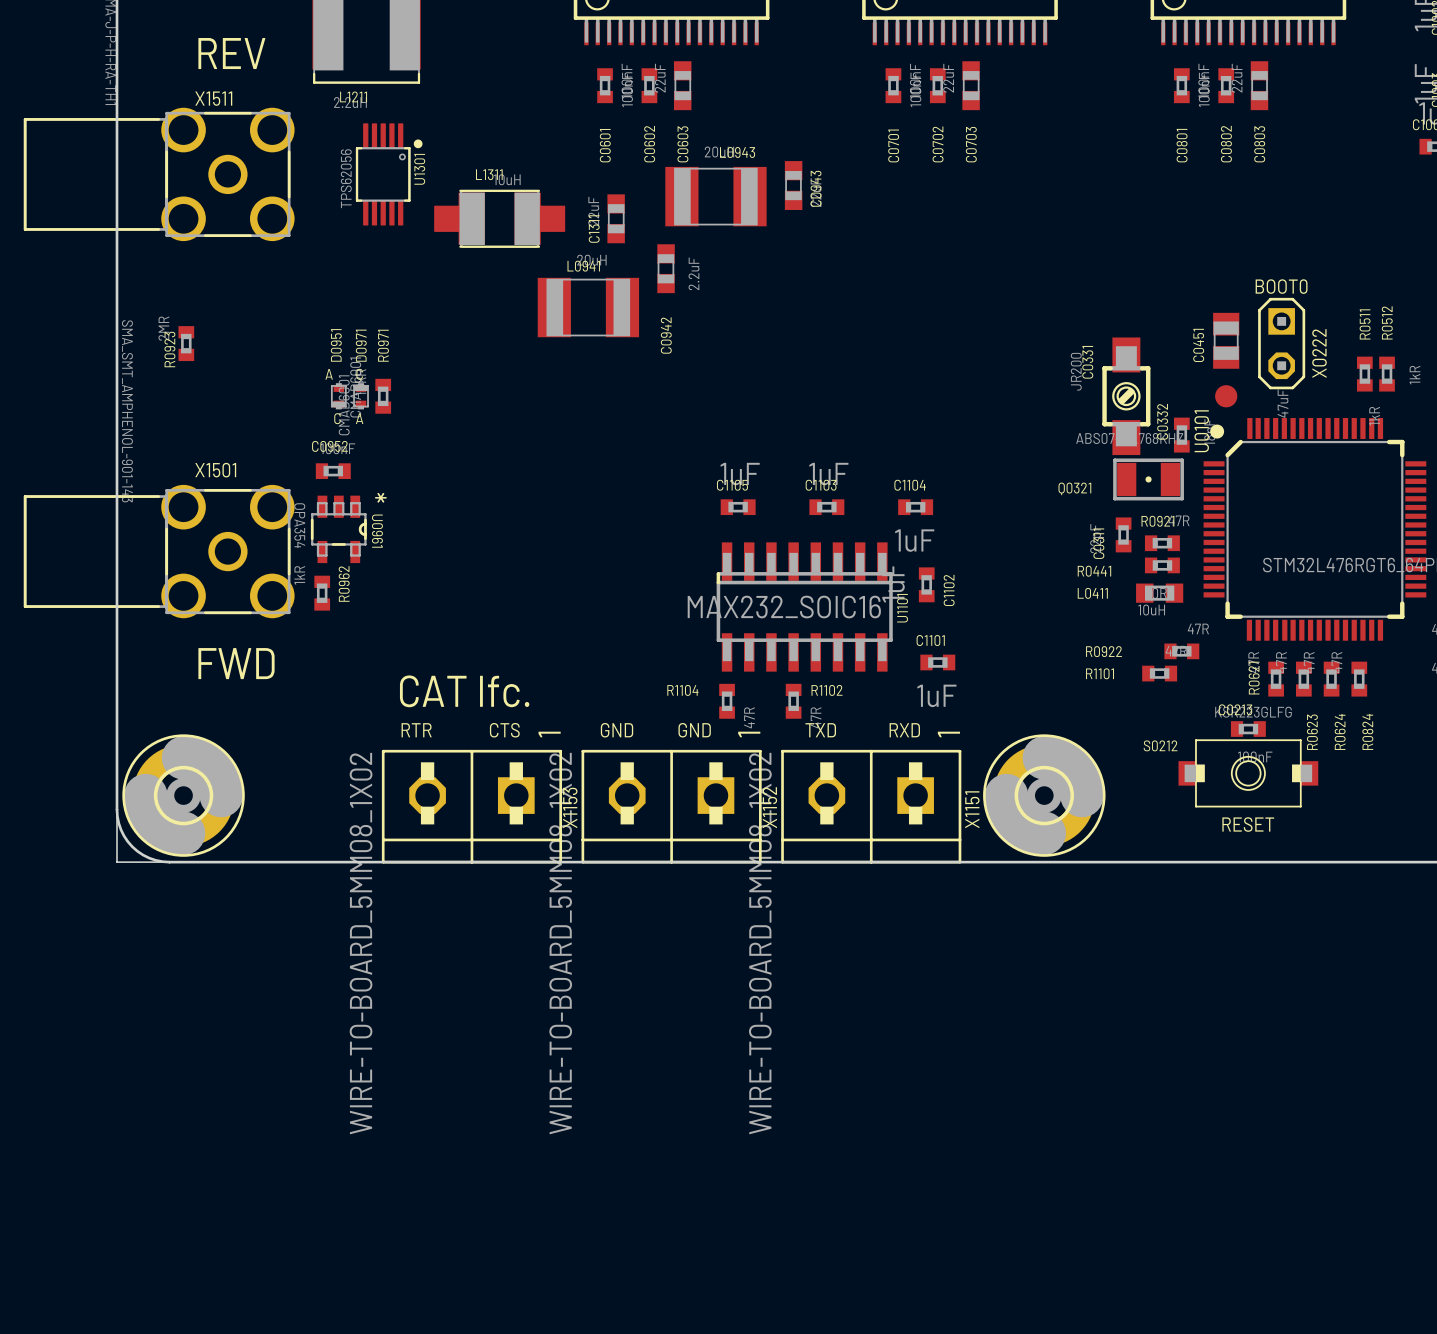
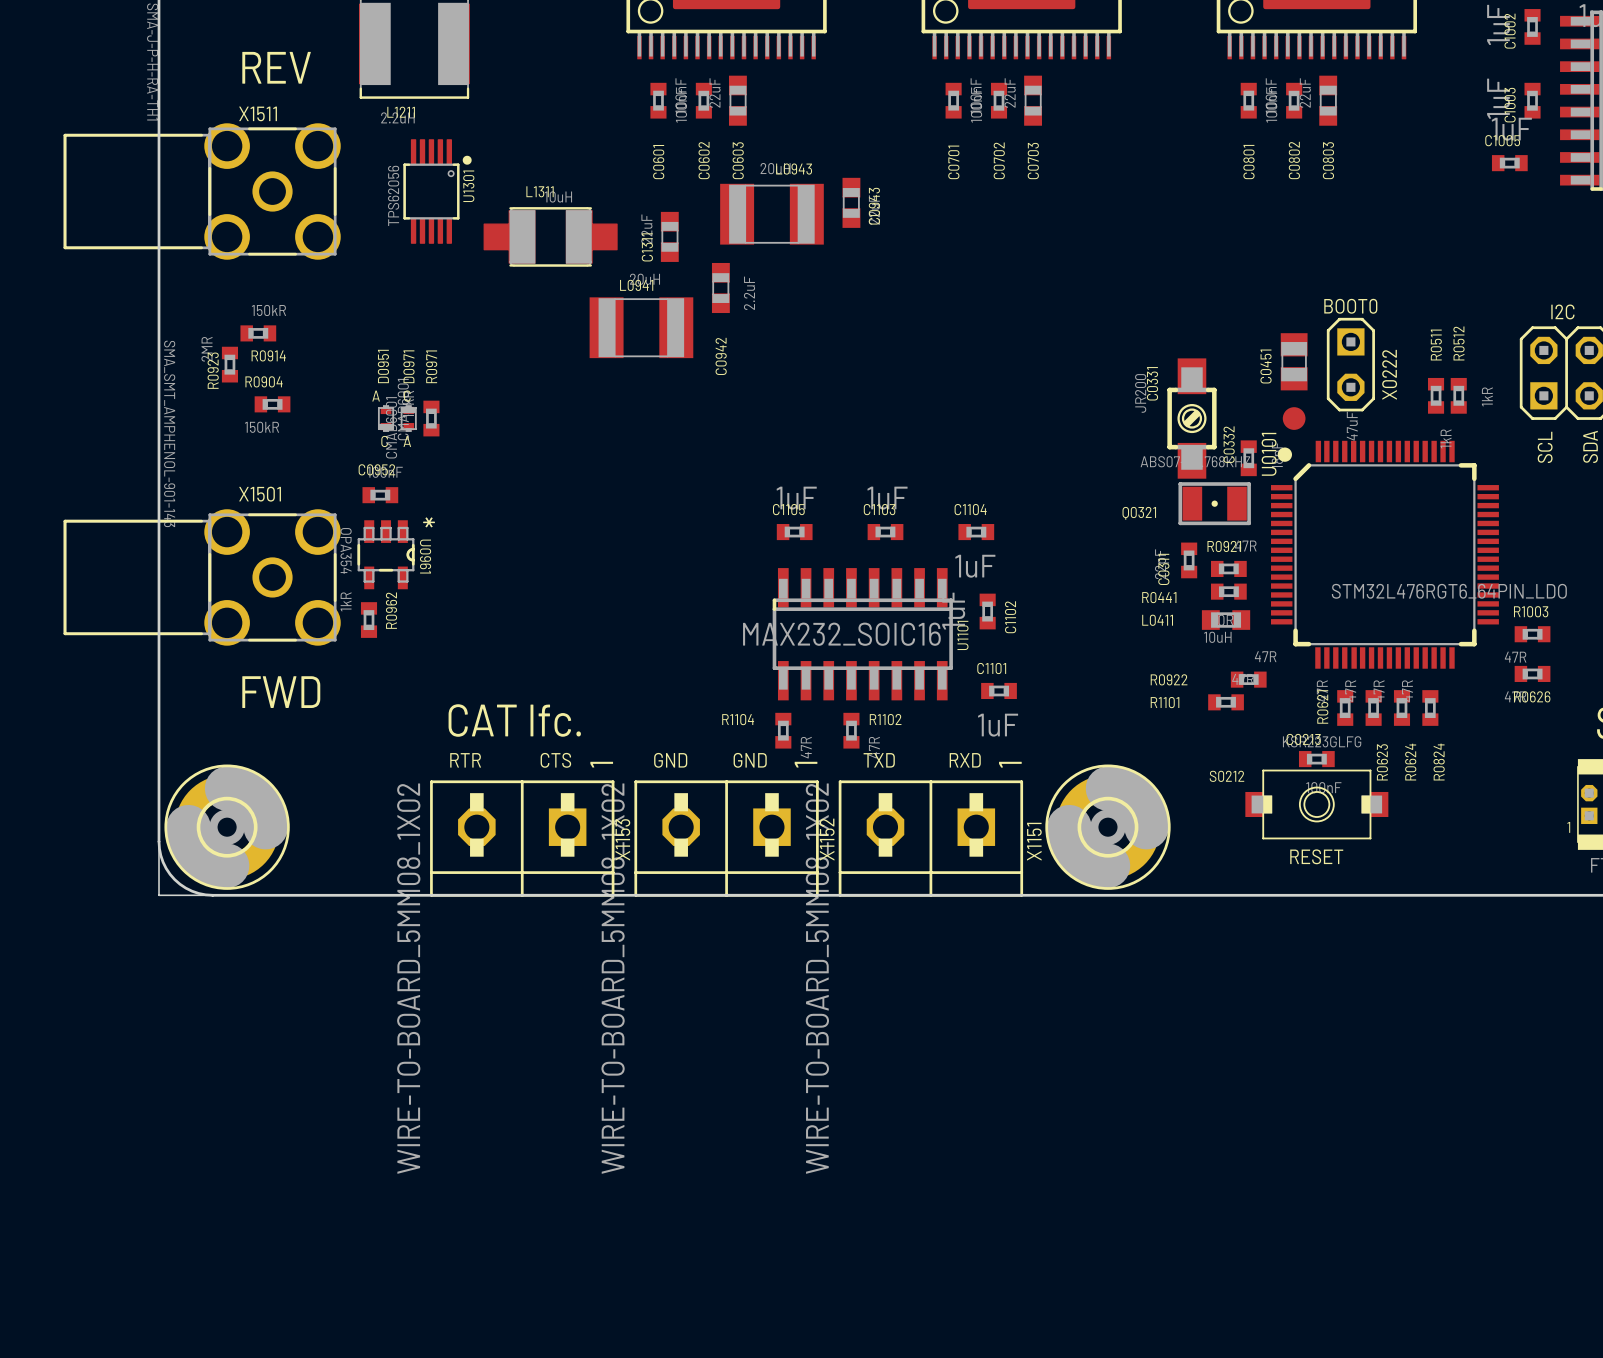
R0914: none -> 150kR (258, 333)
R0904: none -> 150kR (272, 404)

